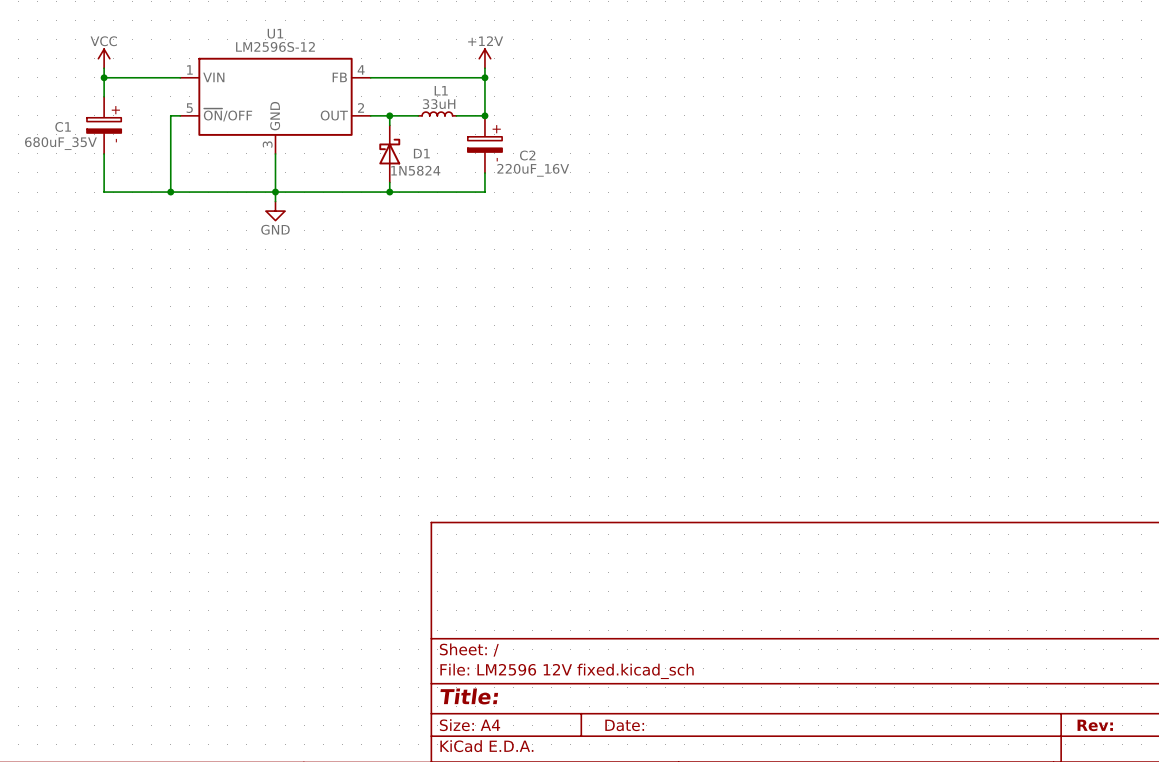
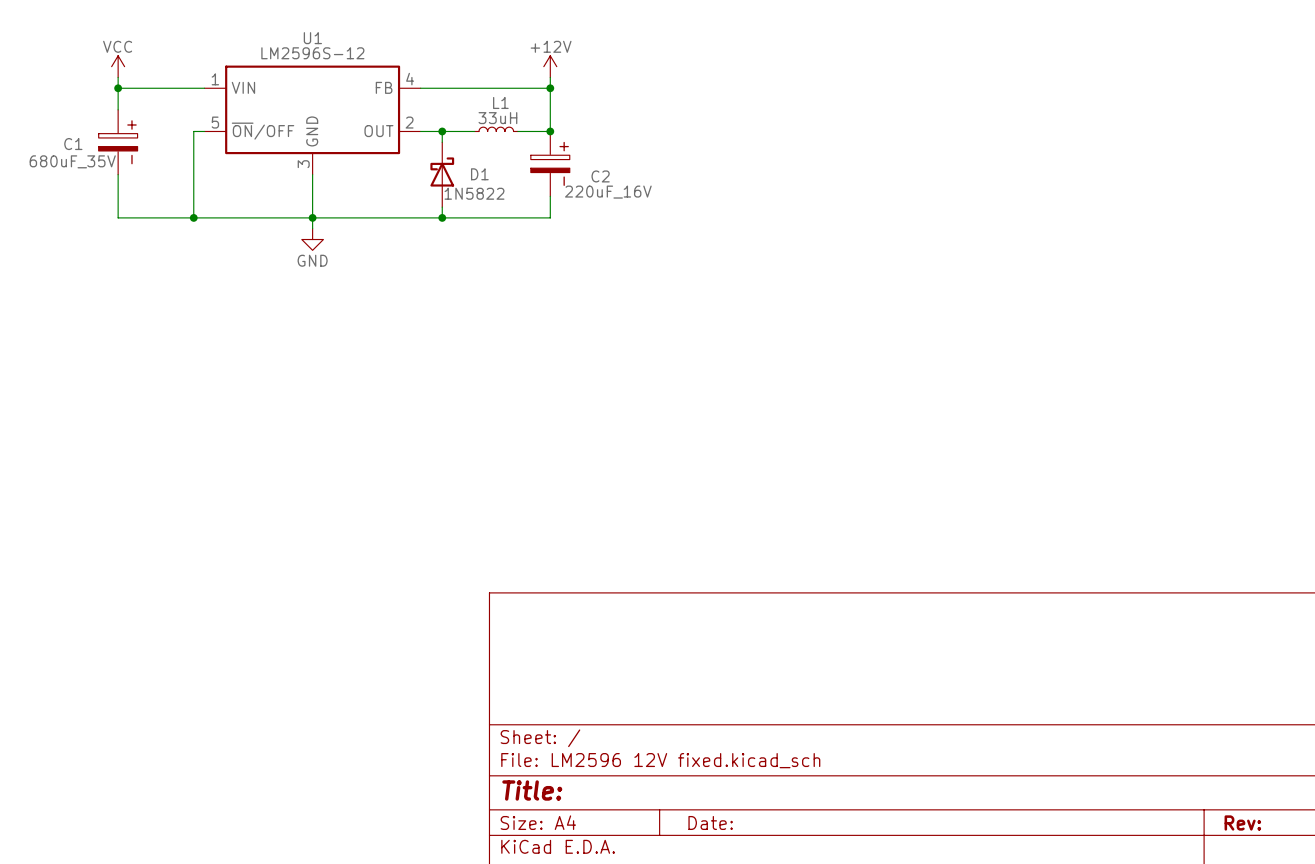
D1 value: 1N5824 (415, 170) -> 1N5822 (474, 193)

